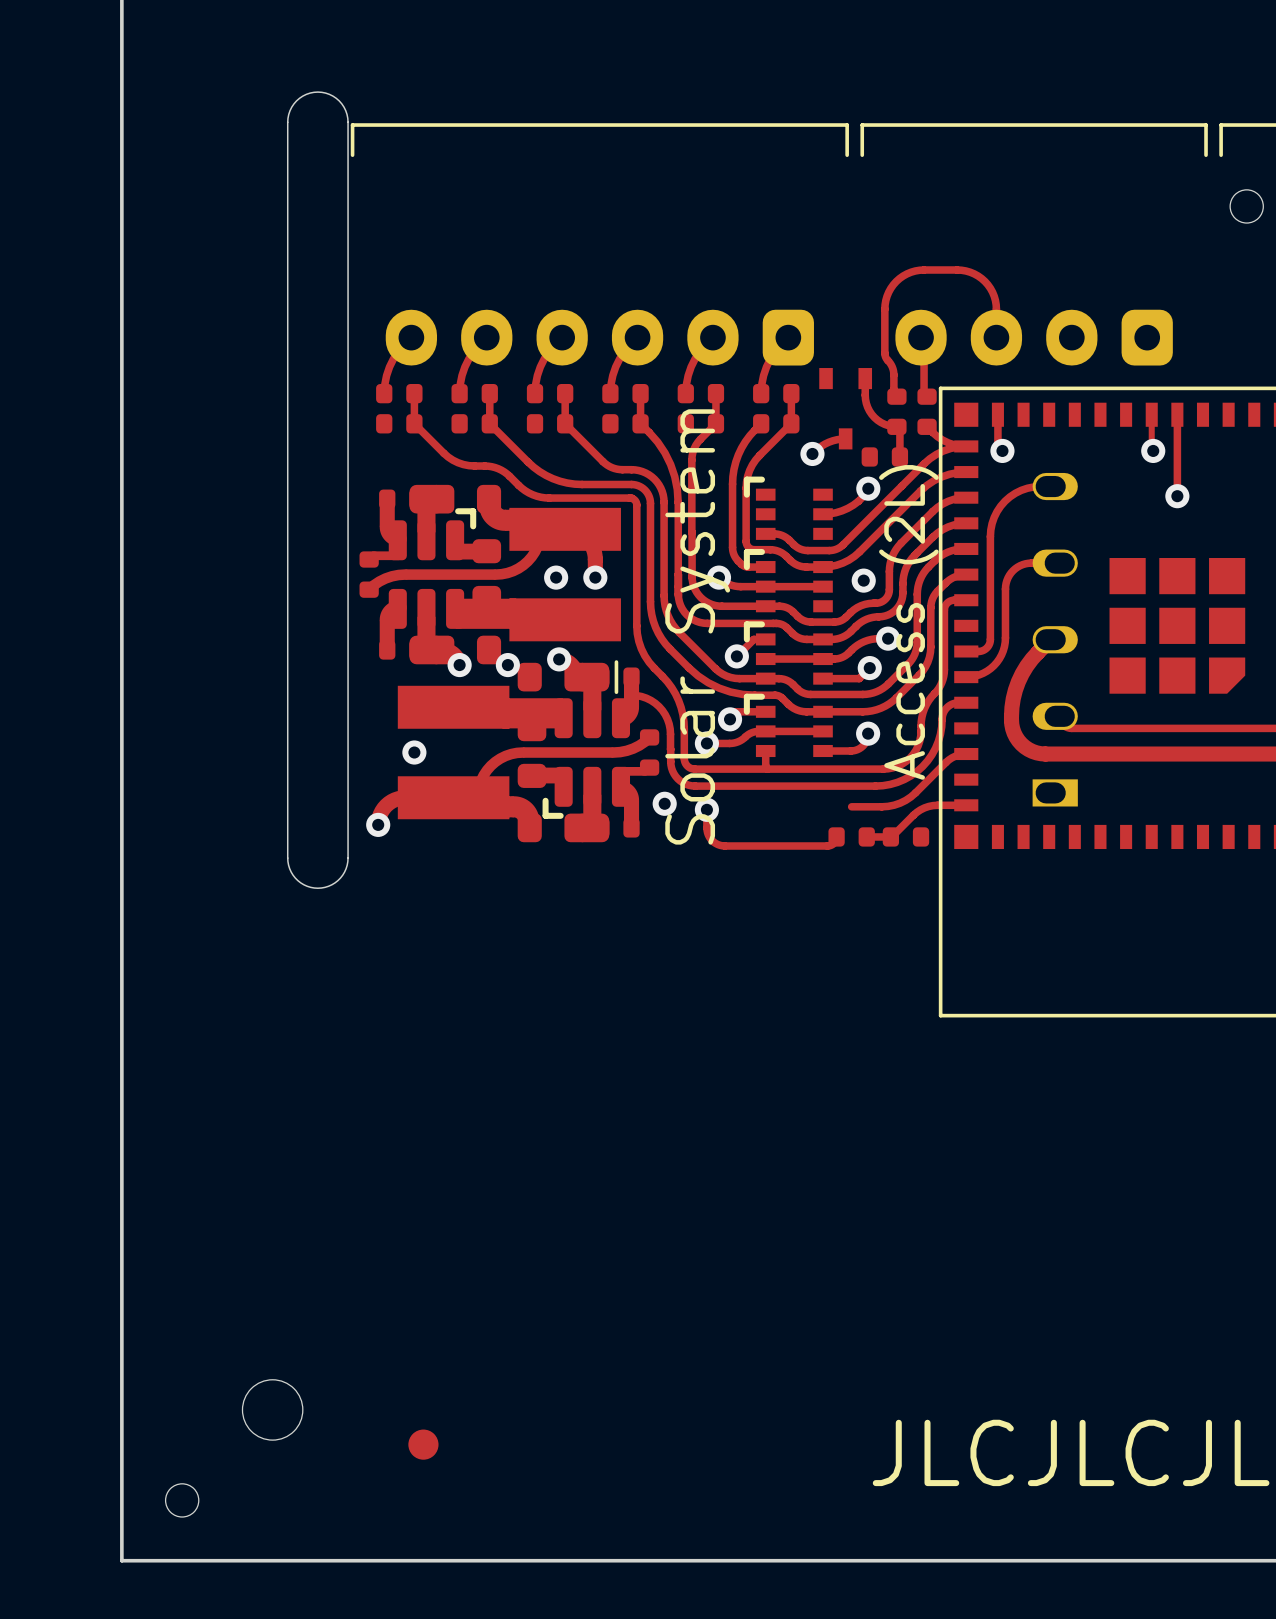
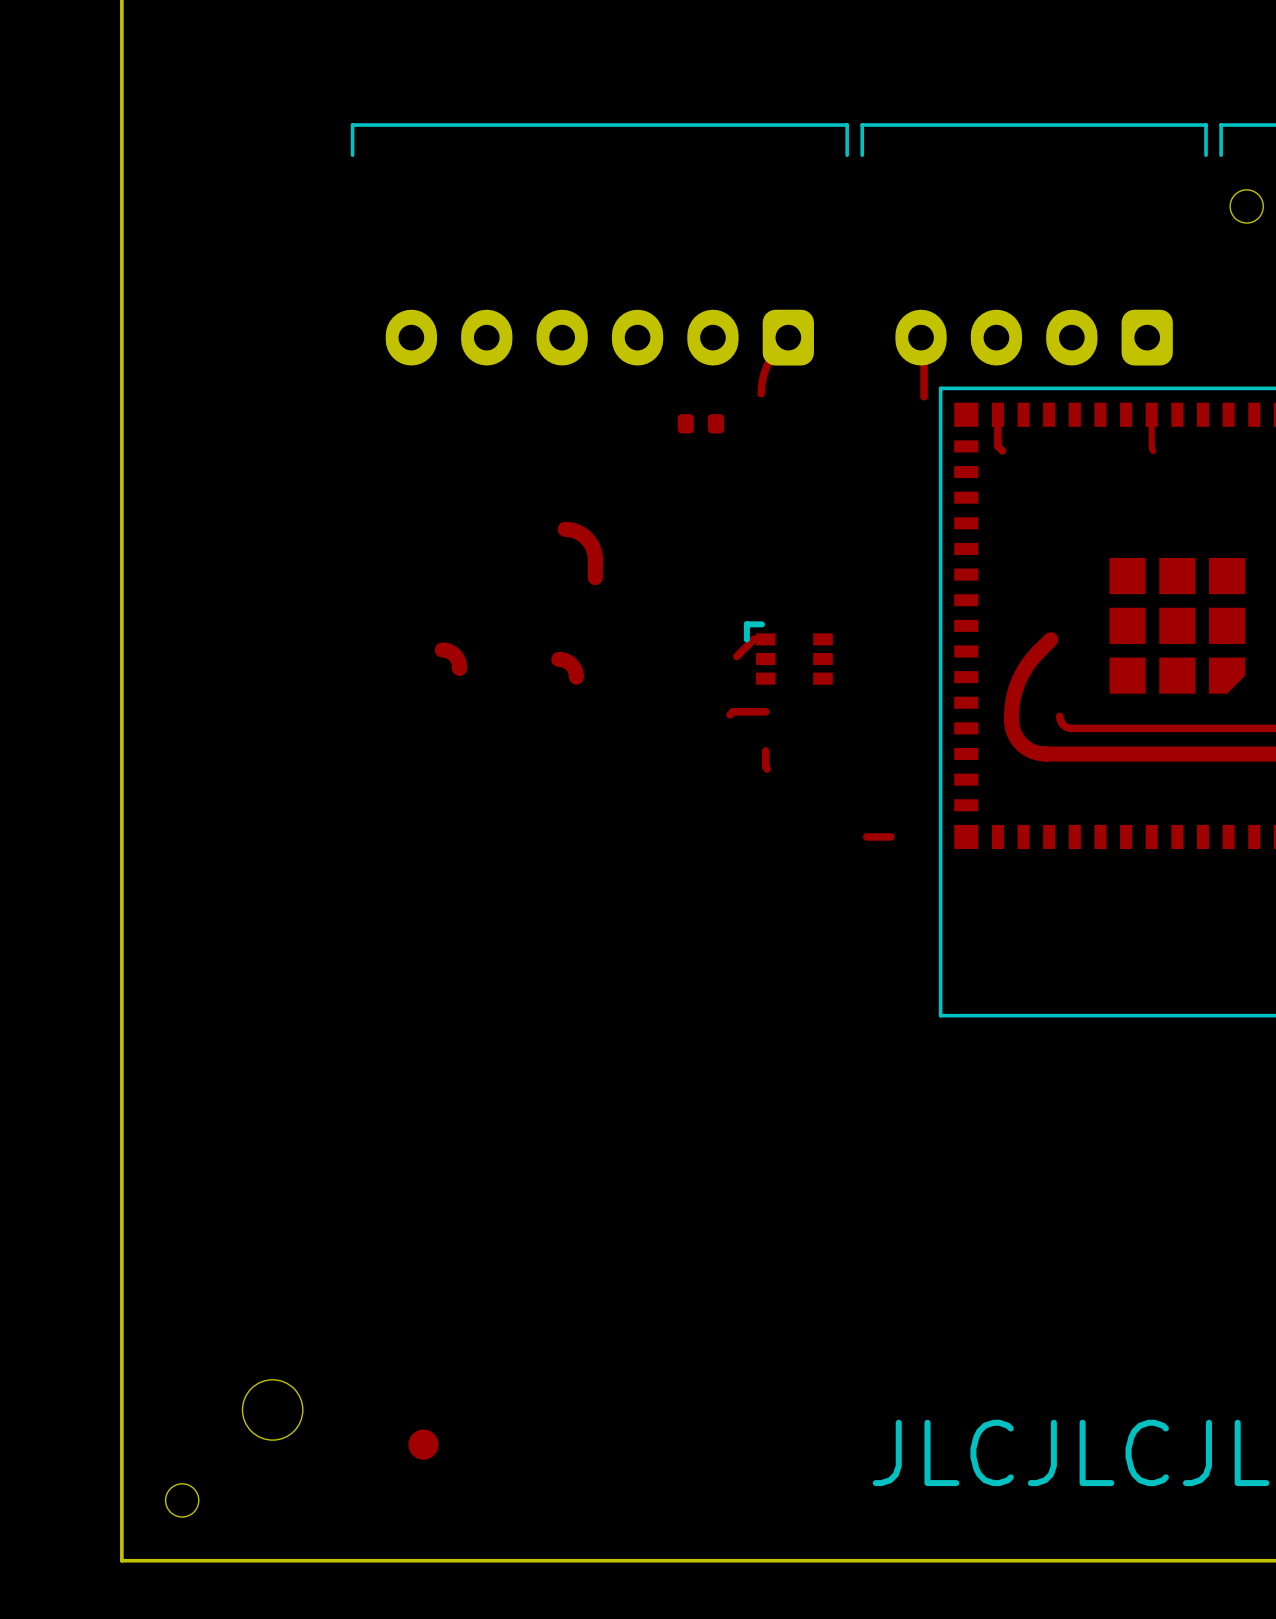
board edge: (287, 122) (287, 858) (291, 872) (297, 880) (307, 886) (317, 888) (328, 886) (337, 880) (344, 872) (348, 858) (348, 122) (345, 110) (339, 100) (329, 94) (317, 92) (306, 94) (296, 100) (290, 110) (287, 122) -> none
track: (996, 337) (996, 309) (994, 296) (987, 284) (978, 276) (957, 270) (919, 270) (903, 276) (890, 288) (884, 309) (884, 354) (893, 369) (893, 390) (896, 396) -> none
track: (404, 344) (389, 366) (384, 393) -> none
track: (480, 344) (464, 366) (459, 393) -> none
track: (555, 344) (540, 366) (535, 393) -> none
track: (630, 344) (615, 366) (610, 393) -> none
track: (706, 344) (691, 366) (685, 393) -> none
track: (865, 378) (865, 399) (871, 414) (881, 422) (896, 426) (899, 429) (899, 456) -> none
part: (399, 393) -> none
track: (414, 393) (414, 423) (443, 453) (457, 462) (498, 468) (525, 490) (540, 497) (631, 498) -> none
part: (474, 393) -> none
track: (489, 393) (489, 423) (539, 471) (567, 483) (633, 484) (646, 491) (650, 503) (650, 608) (655, 627) (665, 644) (688, 667) (698, 675) (719, 688) (742, 694) (778, 695) (793, 708) (803, 711) (862, 711) (881, 708) (896, 697) (919, 675) (927, 662) (930, 646) (931, 604) (933, 595) (950, 579) (966, 574) -> none
part: (550, 393) -> none
track: (565, 393) (565, 423) (603, 461) (614, 468) (635, 469) (645, 472) (659, 484) (663, 498) (664, 595) (666, 610) (679, 632) (715, 668) (726, 676) (739, 678) (784, 679) (801, 691) (808, 694) (866, 694) (879, 690) (908, 664) (914, 654) (917, 642) (917, 590) (921, 576) (940, 555) (951, 550) (963, 548) -> none
part: (625, 393) -> none
track: (640, 393) (640, 423) (664, 452) (670, 464) (677, 489) (678, 596) -> none
part: (700, 393) -> none
track: (715, 393) (715, 423) (697, 442) (692, 456) (692, 577) -> none
part: (776, 393) -> none
track: (791, 393) (791, 423) (755, 459) (747, 476) (746, 541) (751, 549) (778, 551) (795, 564) (803, 566) (829, 566) (842, 563) (859, 551) (926, 485) (949, 474) (966, 472) -> none
part: (845, 408) -> none
part: (896, 411) -> none
part: (927, 411) -> none
track: (1177, 414) (1177, 496) -> none
part: (399, 423) -> none
part: (474, 423) -> none
part: (550, 423) -> none
part: (625, 423) -> none
track: (761, 423) (741, 448) (734, 469) (732, 547) (735, 558) (743, 565) (765, 567) -> none
part: (776, 423) -> none
track: (927, 426) (942, 440) (954, 444) (966, 446) (950, 448) (929, 458) (840, 547) (831, 550) (805, 550) (798, 547) (782, 535) (765, 533) -> none
track: (845, 438) (828, 442) (812, 453) -> none
via: (1002, 450) -> none
via: (1153, 450) -> none
via: (812, 453) -> none
part: (884, 456) -> none
track: (1050, 486) (1033, 486) (1021, 490) (1009, 496) (997, 511) (992, 523) (990, 536) (990, 642) (982, 650) (966, 651) -> none
track: (868, 488) (868, 491) (858, 501) (847, 508) (823, 514) -> none
via: (868, 488) -> none
via: (1177, 496) -> none
track: (966, 497) (954, 499) (937, 507) (898, 546) (890, 563) (889, 591) (885, 599) (879, 602) (861, 605) (839, 621) (806, 621) (790, 609) (781, 606) (712, 604) (703, 599) (696, 592) (692, 576) -> none
track: (629, 498) (634, 500) (636, 504) (636, 625) (638, 641) (649, 662) (667, 681) (678, 700) (683, 721) (684, 759) (687, 766) (692, 768) (883, 769) (902, 764) (909, 758) (918, 745) (924, 708) (942, 679) (944, 606) (950, 600) (966, 600) -> none
part: (788, 508) -> none
track: (966, 523) (954, 524) (942, 529) (912, 558) (904, 572) (902, 598) (895, 609) (885, 615) (863, 620) (846, 634) (836, 638) (801, 638) (784, 625) (777, 623) (699, 622) (684, 612) (678, 594) -> none
track: (1059, 563) (1025, 563) (1011, 572) (1005, 586) (1005, 642) (1001, 654) (987, 671) (966, 677) -> none
part: (490, 574) -> none
via: (556, 577) -> none
via: (595, 577) -> none
track: (718, 577) (726, 583) (737, 586) (823, 586) -> none
via: (718, 577) -> none
part: (788, 580) -> none
via: (863, 580) -> none
text: Access (2L) (908, 622) -> none
text: Solar System (697, 626) -> none
track: (888, 638) (864, 641) (838, 658) (765, 659) -> none
via: (888, 638) -> none
part: (1055, 639) -> none
via: (736, 656) -> none
via: (559, 659) -> none
line: (616, 662) (616, 692) -> none
via: (459, 665) -> none
via: (507, 665) -> none
track: (869, 668) (859, 678) (823, 678) -> none
via: (869, 668) -> none
track: (631, 695) (651, 700) (662, 710) (669, 724) (670, 749) -> none
track: (958, 702) (949, 705) (944, 710) (938, 741) (931, 754) (922, 766) (904, 779) (882, 785) (692, 785) (683, 782) (674, 773) (670, 764) (670, 749) -> none
via: (730, 719) -> none
part: (788, 725) -> none
track: (823, 731) (756, 731) (733, 743) (706, 743) -> none
track: (868, 733) (865, 742) (857, 749) (823, 751) -> none
via: (868, 733) -> none
via: (706, 743) -> none
via: (414, 752) -> none
part: (528, 752) -> none
track: (966, 754) (948, 759) (915, 792) (900, 803) (888, 806) (851, 806) -> none
track: (405, 797) (394, 799) (386, 805) (380, 814) (378, 824) -> none
via: (664, 803) -> none
track: (966, 805) (937, 805) (924, 807) (913, 815) (891, 836) -> none
track: (706, 809) (708, 834) (713, 842) (720, 845) (828, 845) (833, 843) (836, 836) -> none
via: (706, 809) -> none
via: (378, 824) -> none
part: (851, 836) -> none
part: (905, 836) -> none

